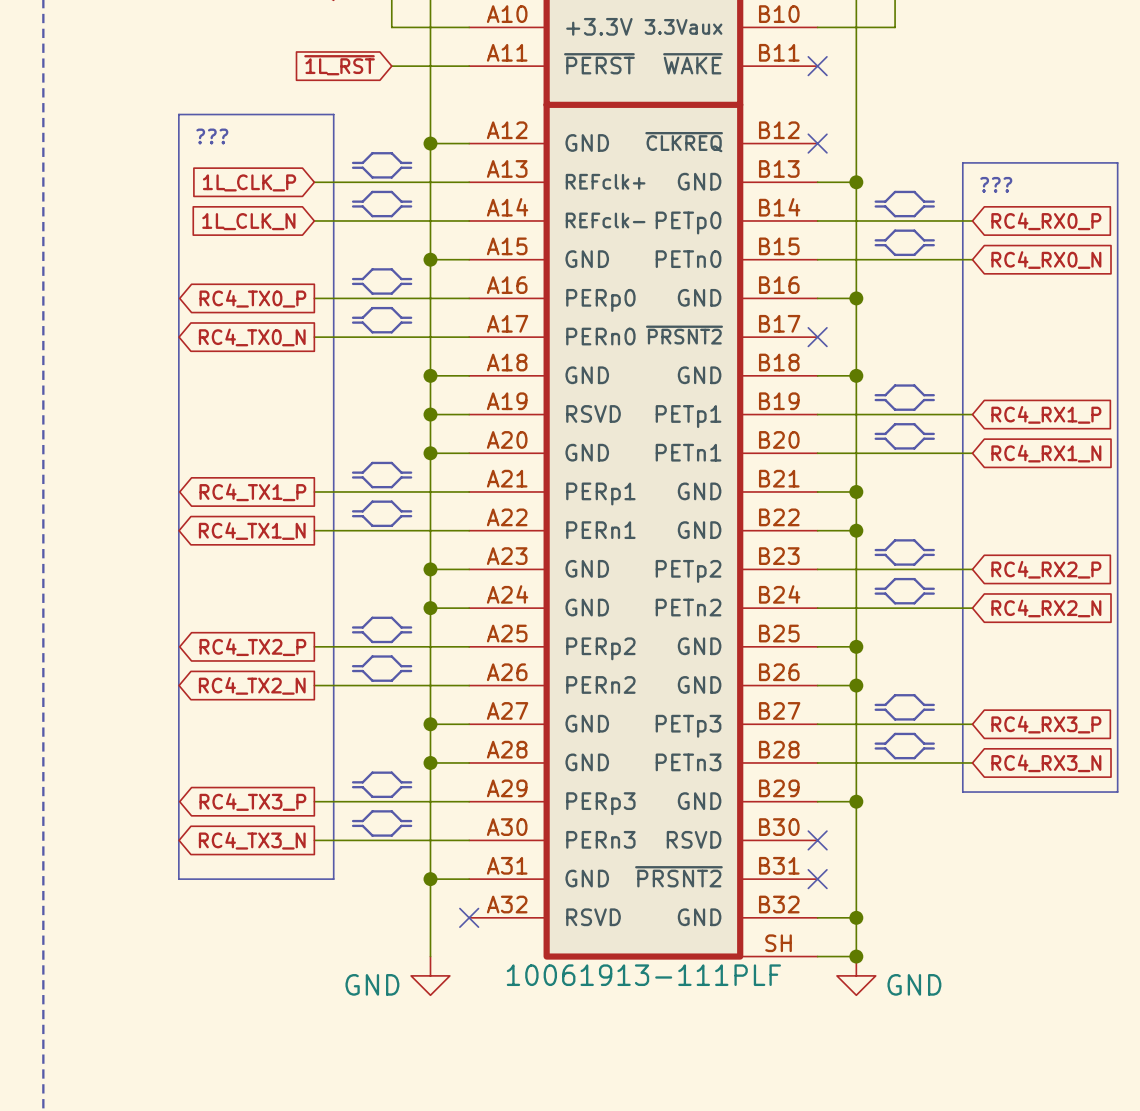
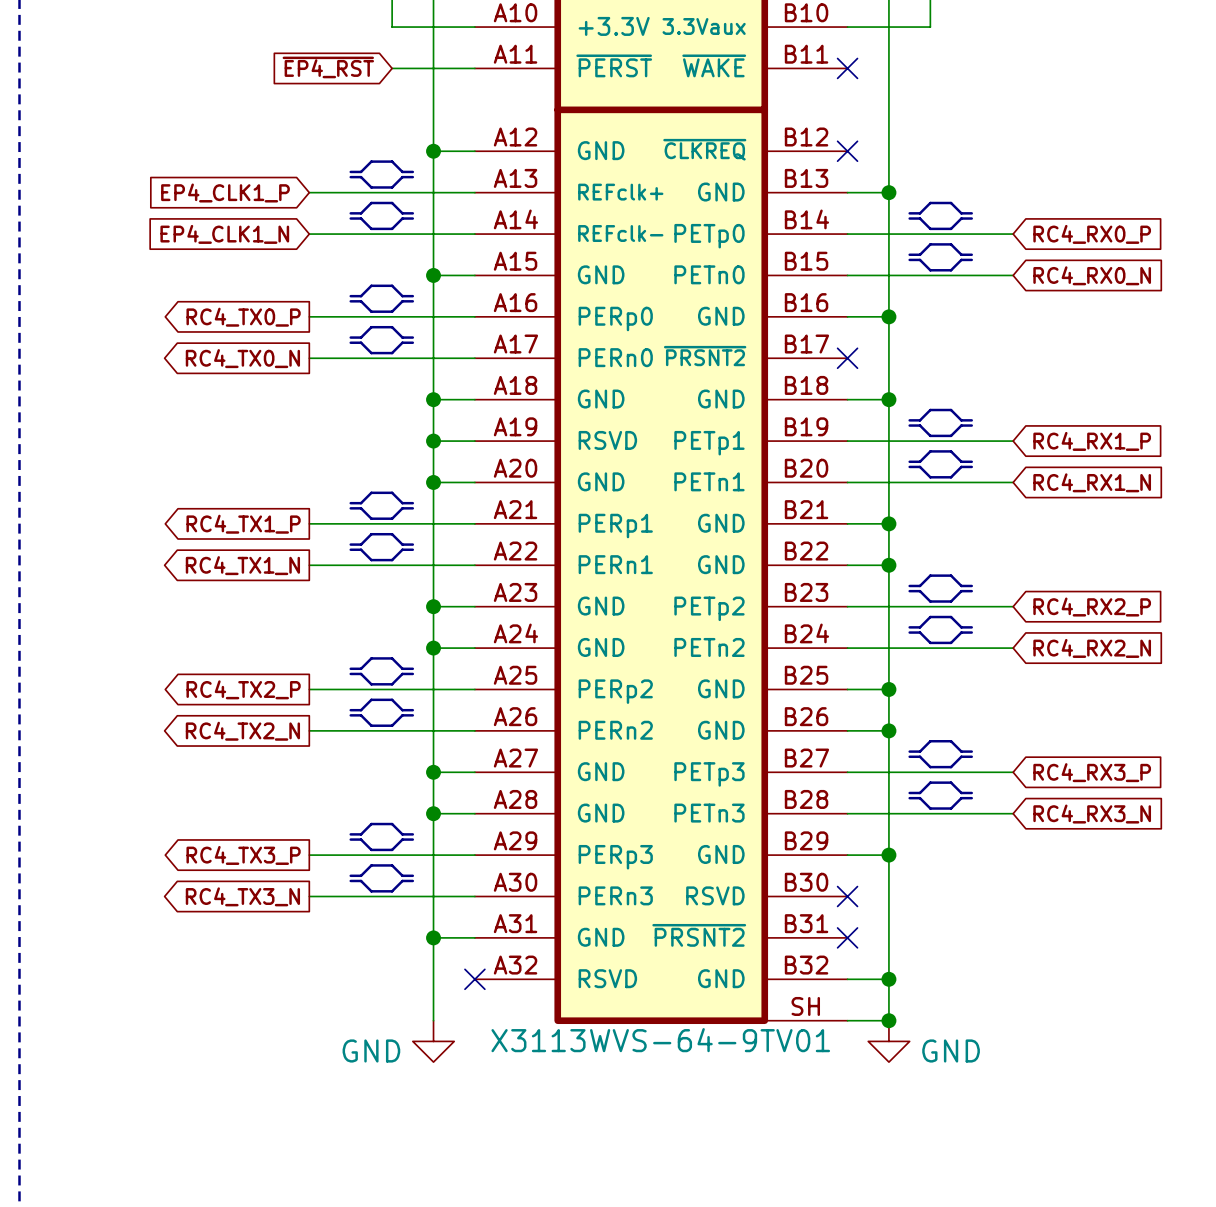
global label: ~{1L_RST} (339, 65) -> ~{EP4_RST} (328, 67)
line: (178, 114) (333, 114) (333, 879) (178, 879) (178, 114) -> none
text: ??? (212, 136) -> none
line: (962, 162) (1117, 162) (1117, 792) (962, 792) (962, 162) -> none
global label: 1L_CLK_P (249, 182) -> EP4_CLK1_P (225, 192)
text: ??? (996, 184) -> none
global label: 1L_CLK_N (248, 221) -> EP4_CLK1_N (224, 234)
part value: 10061913-111PLF (643, 975) -> X3113WVS-64-9TV01 (660, 1040)

